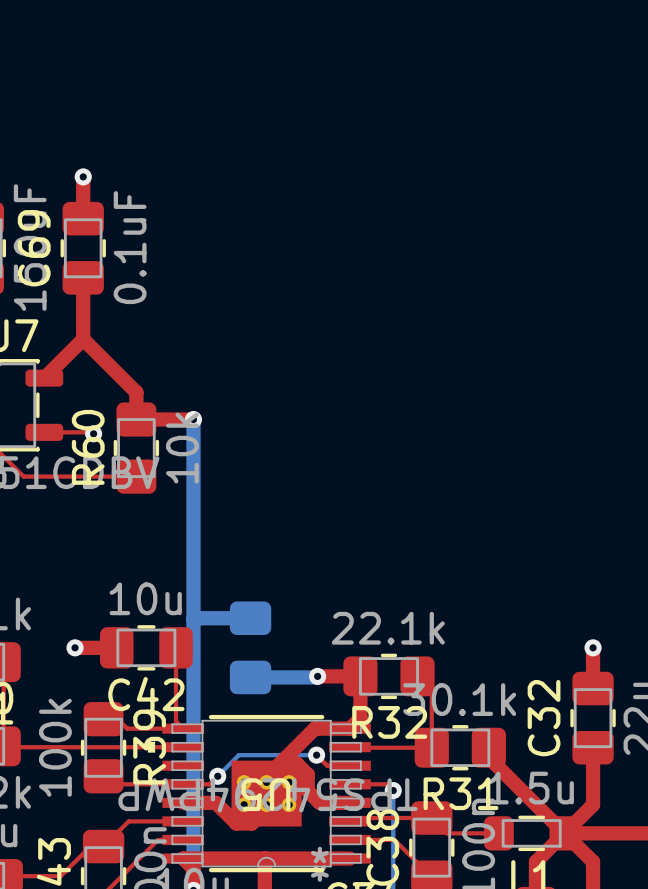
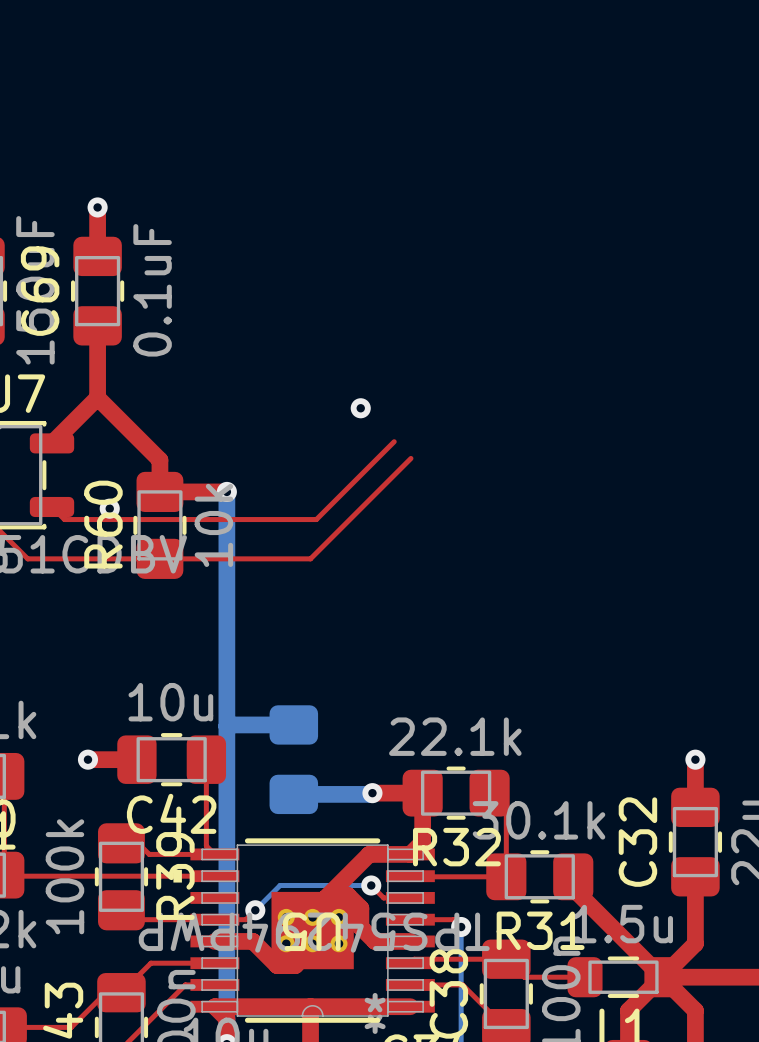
via: none -> (360, 408)
top track: none -> (410, 458) (310, 558) (159, 558)
top track: (44, 432) (93, 433) -> (52, 506) (64, 519) (316, 519) (394, 441)

